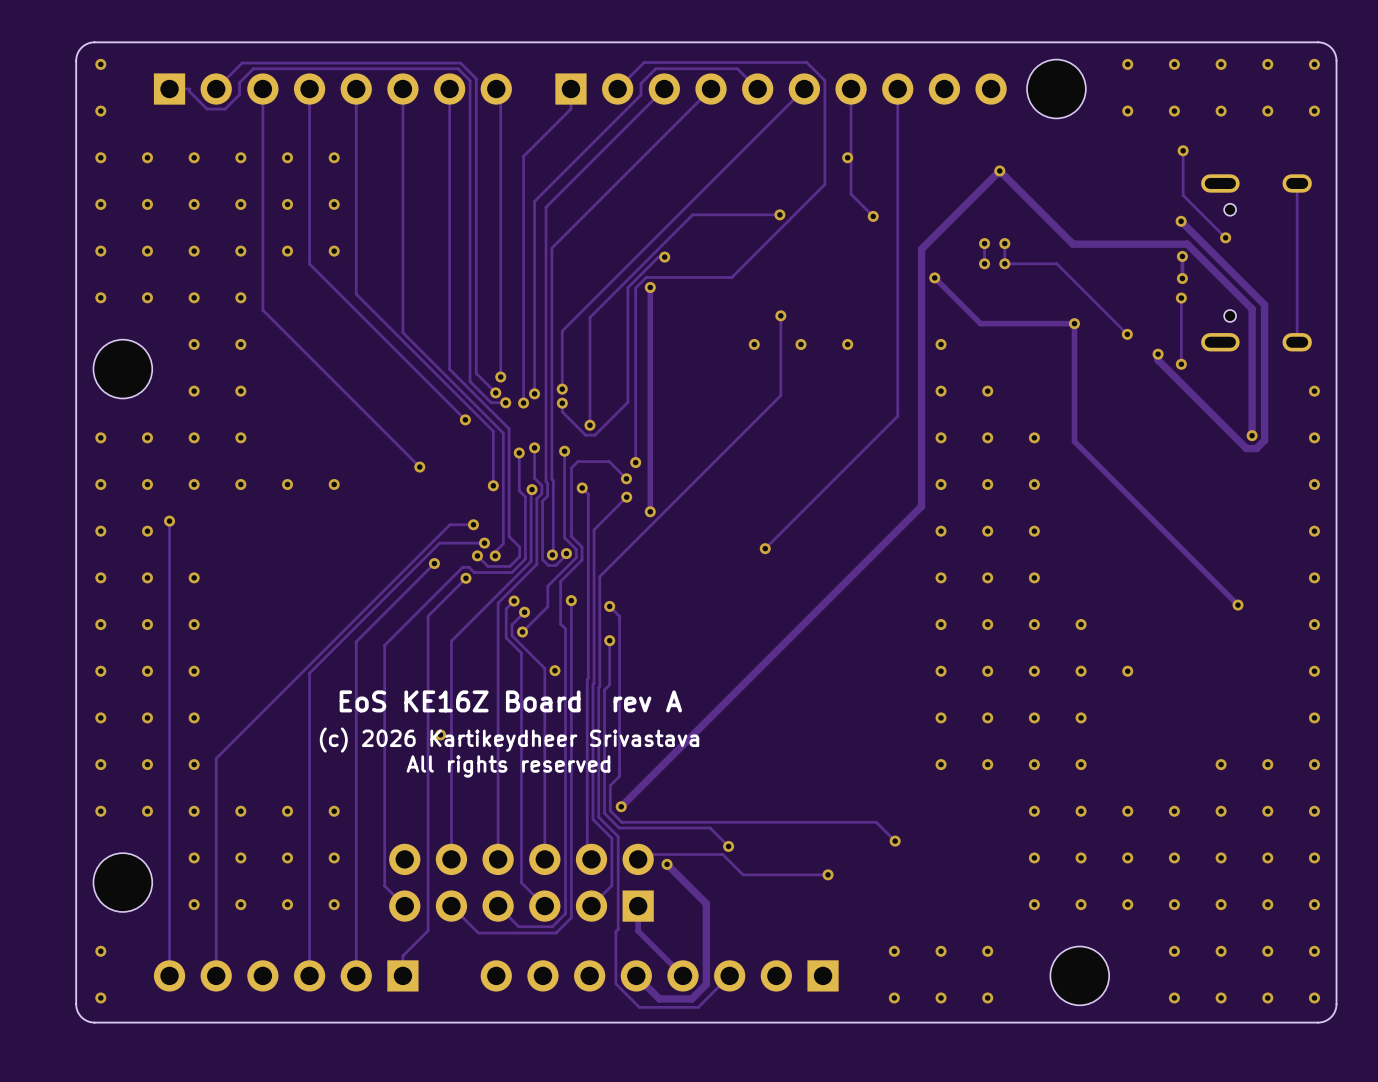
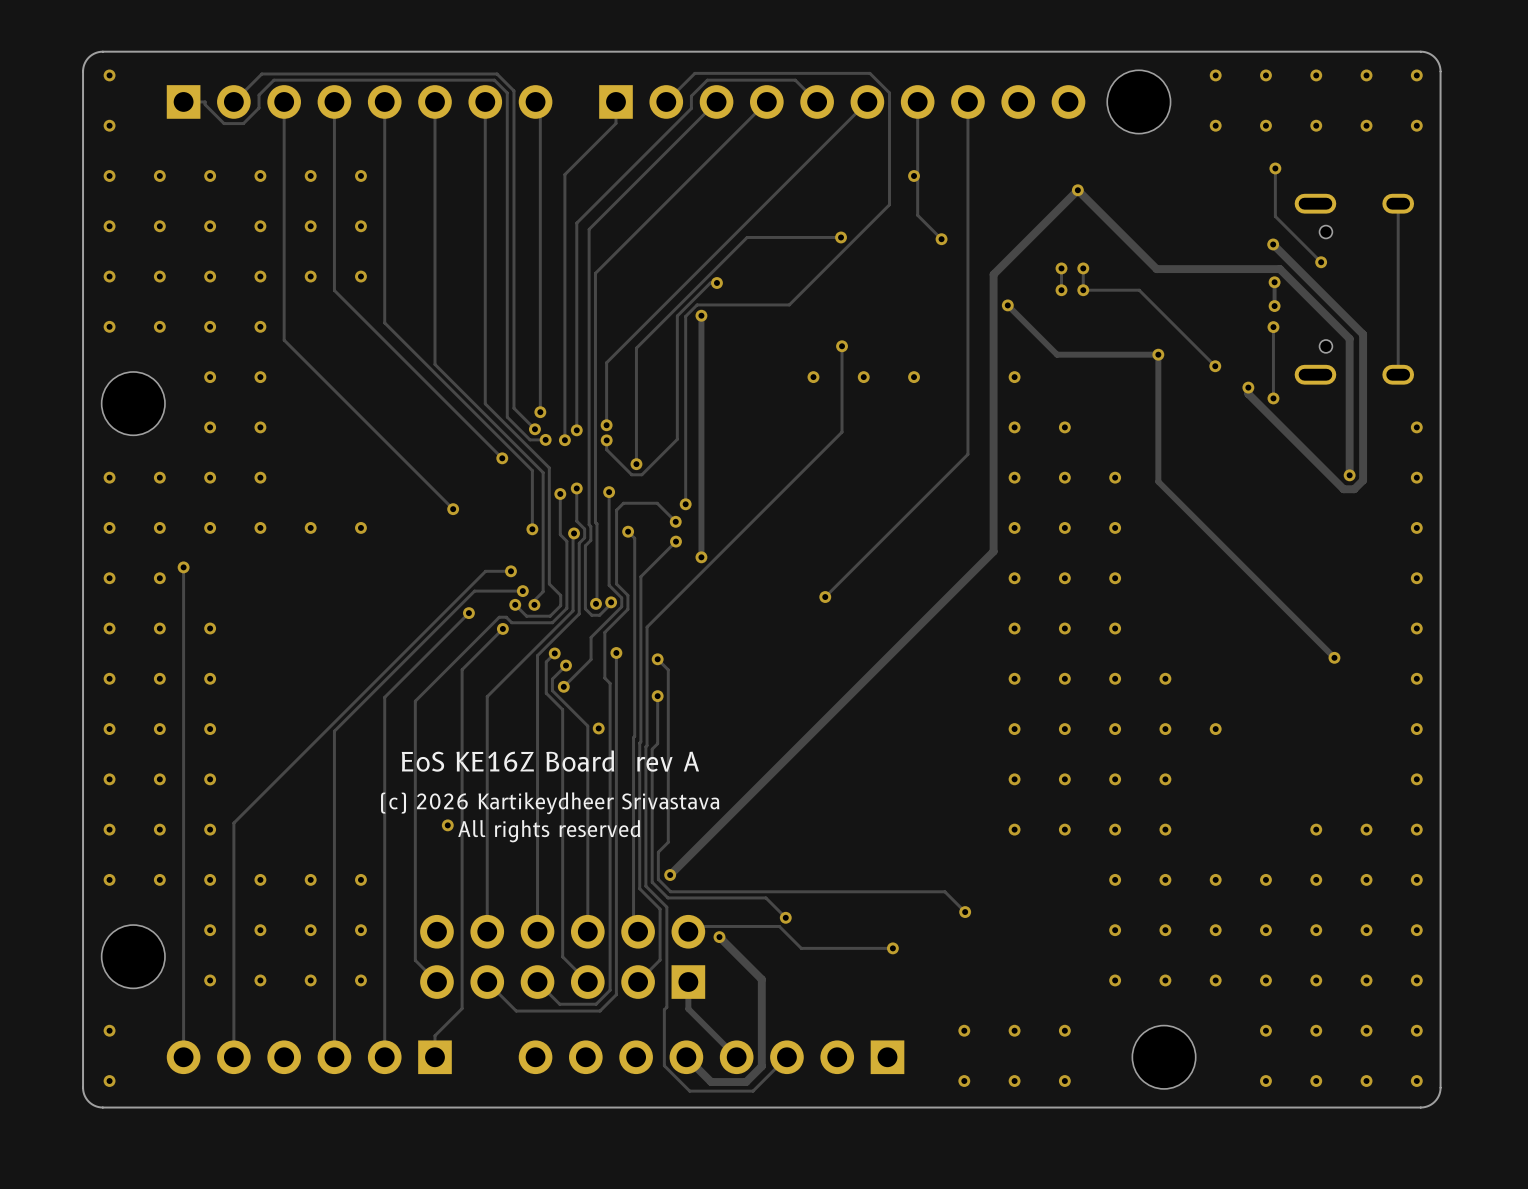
via position: (440, 734) -> (447, 825)

